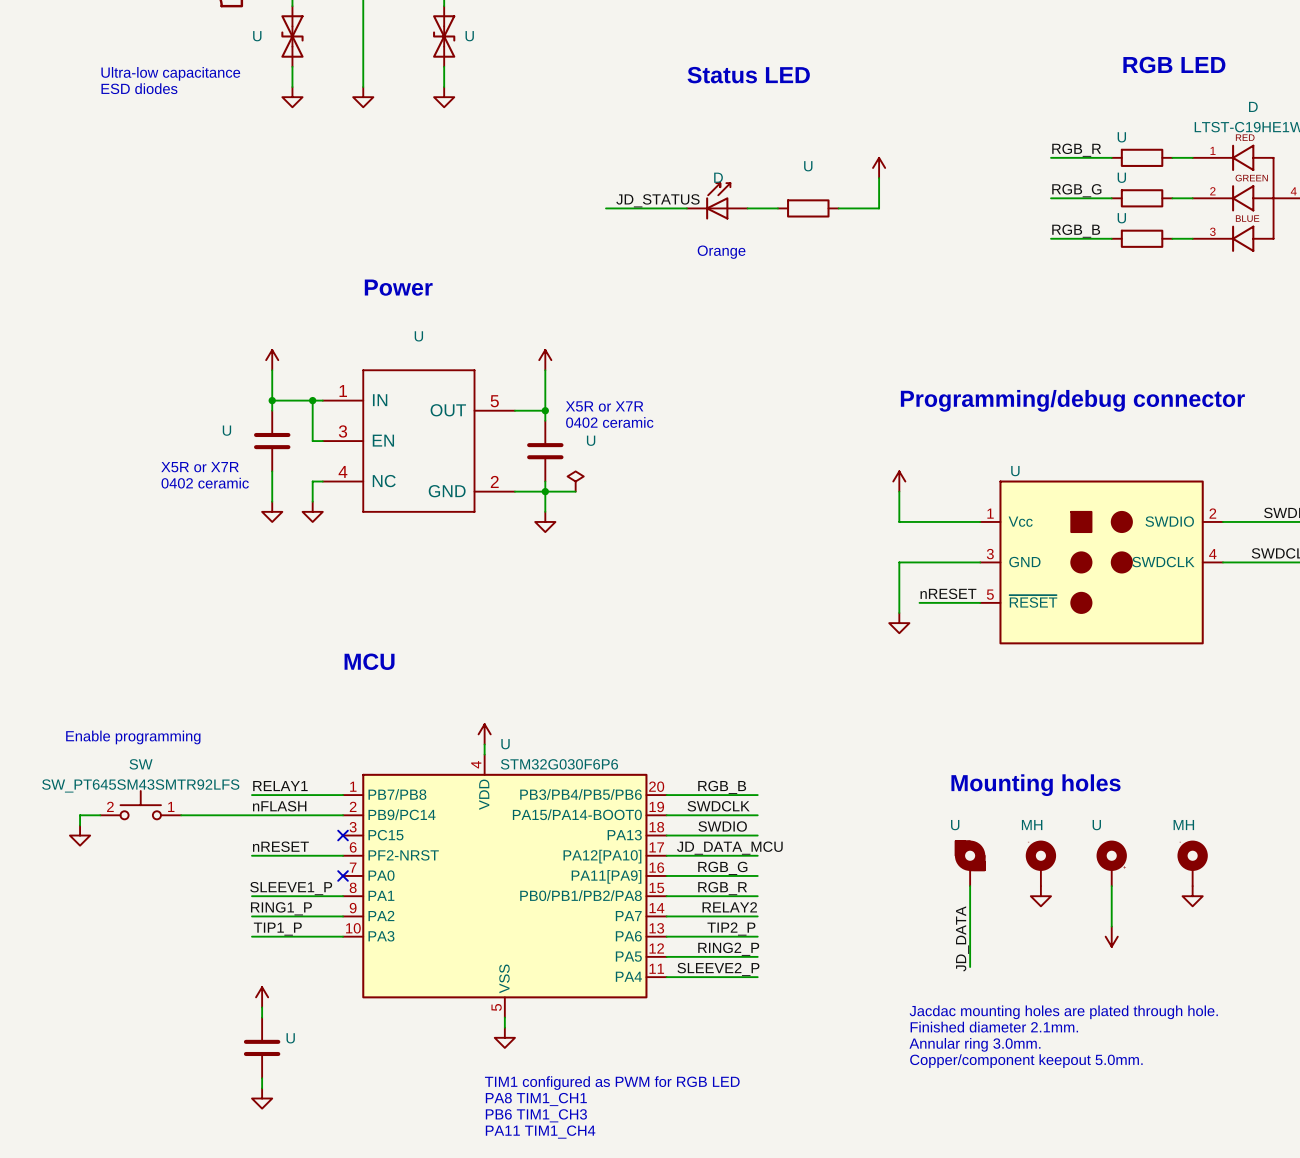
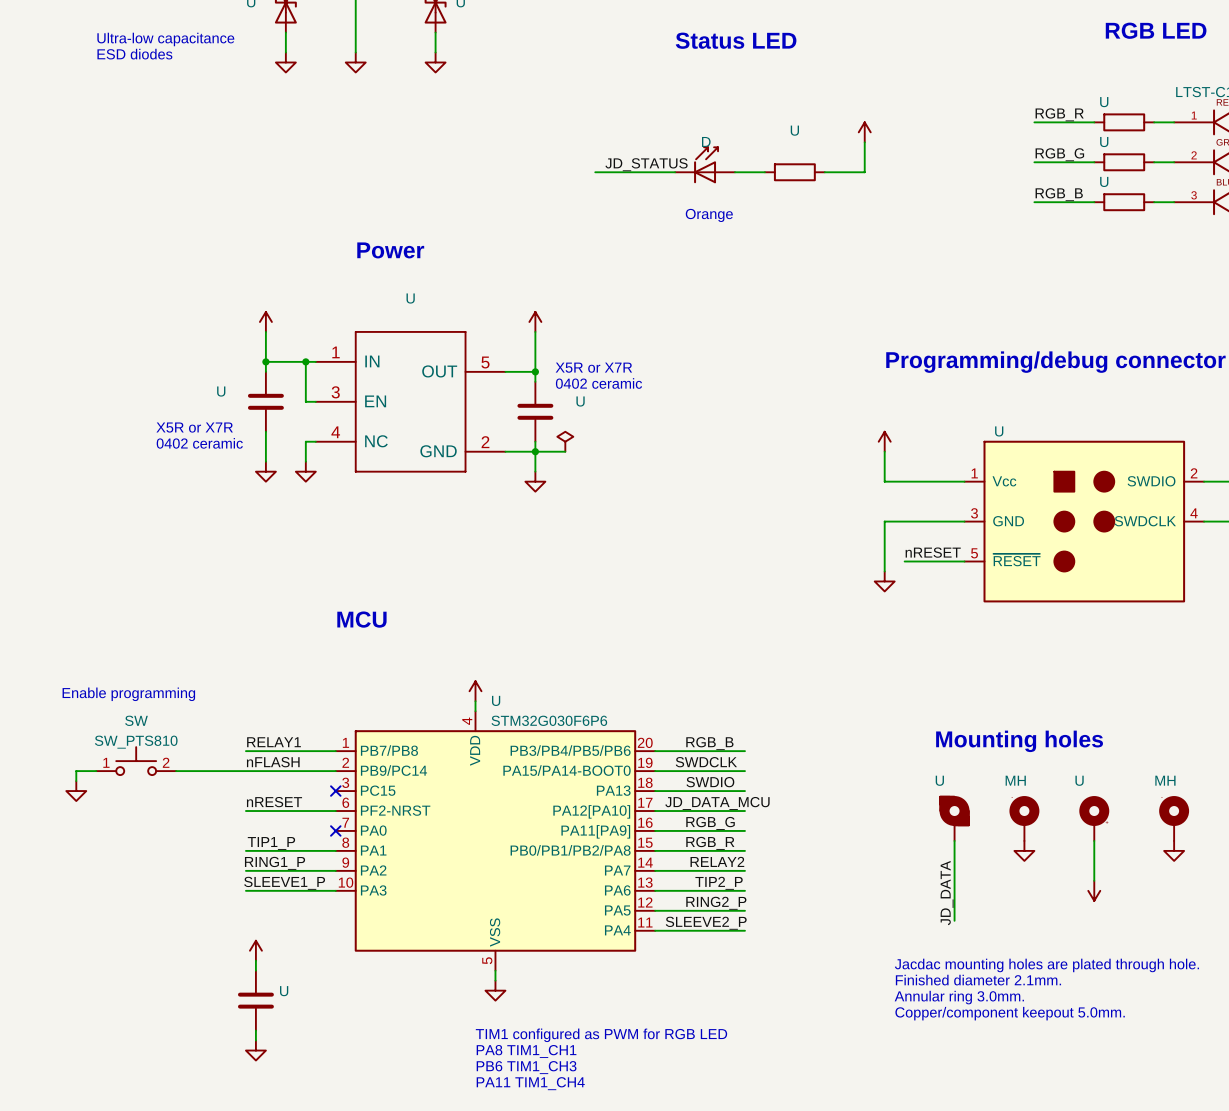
SW value: SW_PT645SM43SMTR92LFS (140, 785) -> SW_PTS810 (136, 742)
SW flip: as is (140, 805) -> left-right (136, 761)
label position: SLEEVE1_P (291, 888) -> SLEEVE1_P (284, 883)
label position: TIP1_P (277, 929) -> TIP1_P (271, 843)

